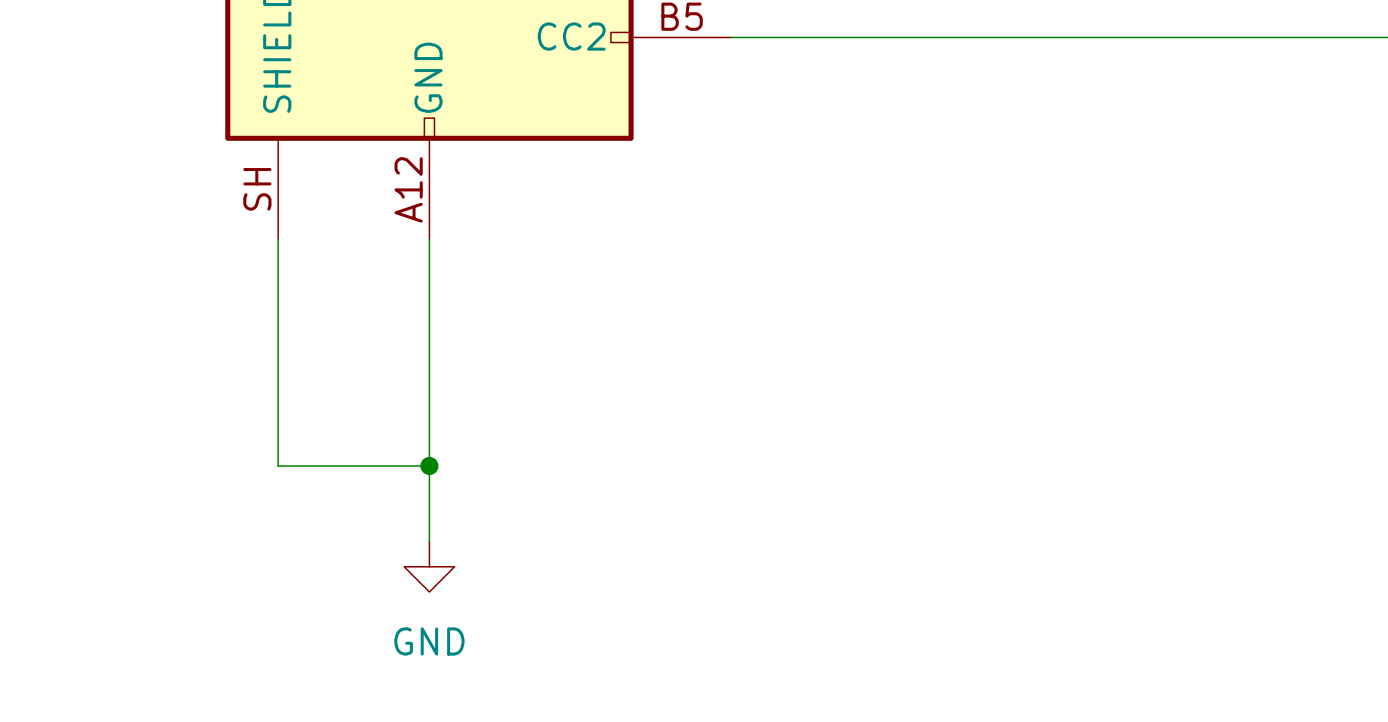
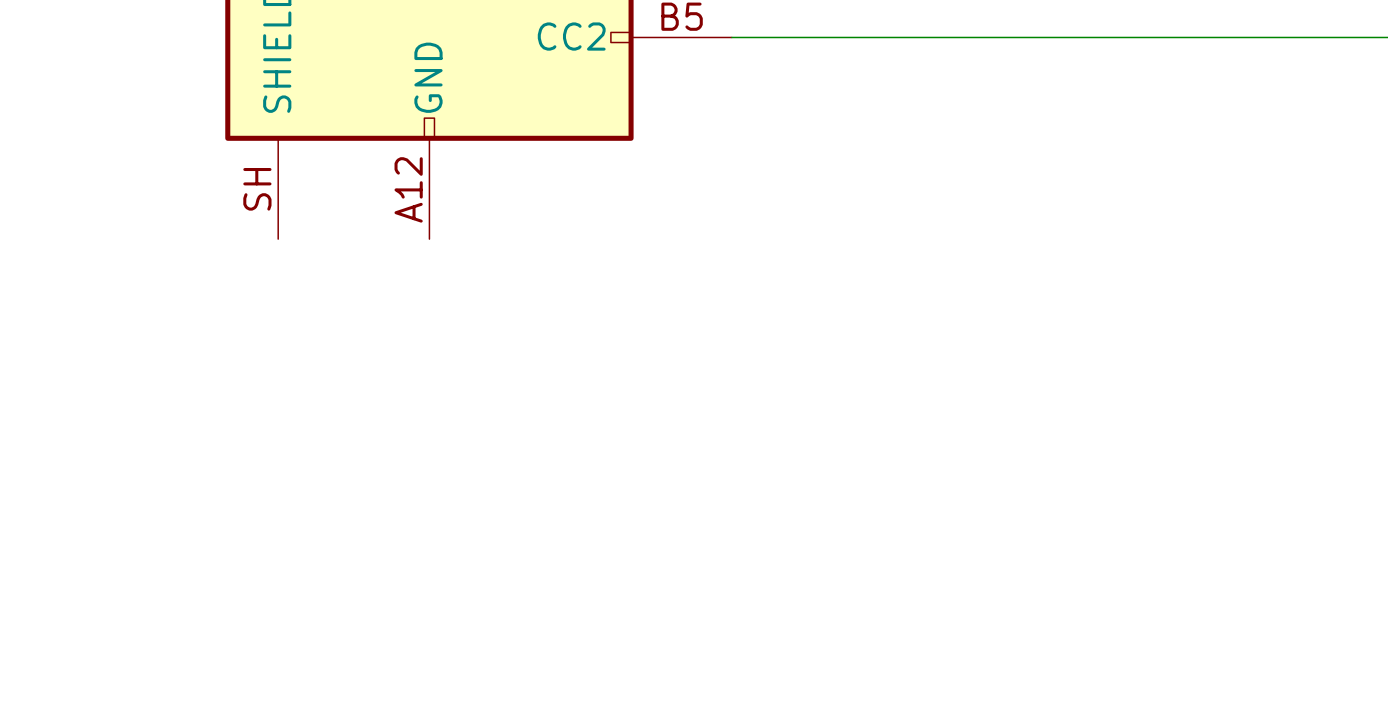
wire: (278, 239) (278, 465) (429, 465) -> none
wire: (429, 239) (429, 541) -> none
junction: (429, 465) -> none
power symbol: GND (429, 566) -> none

